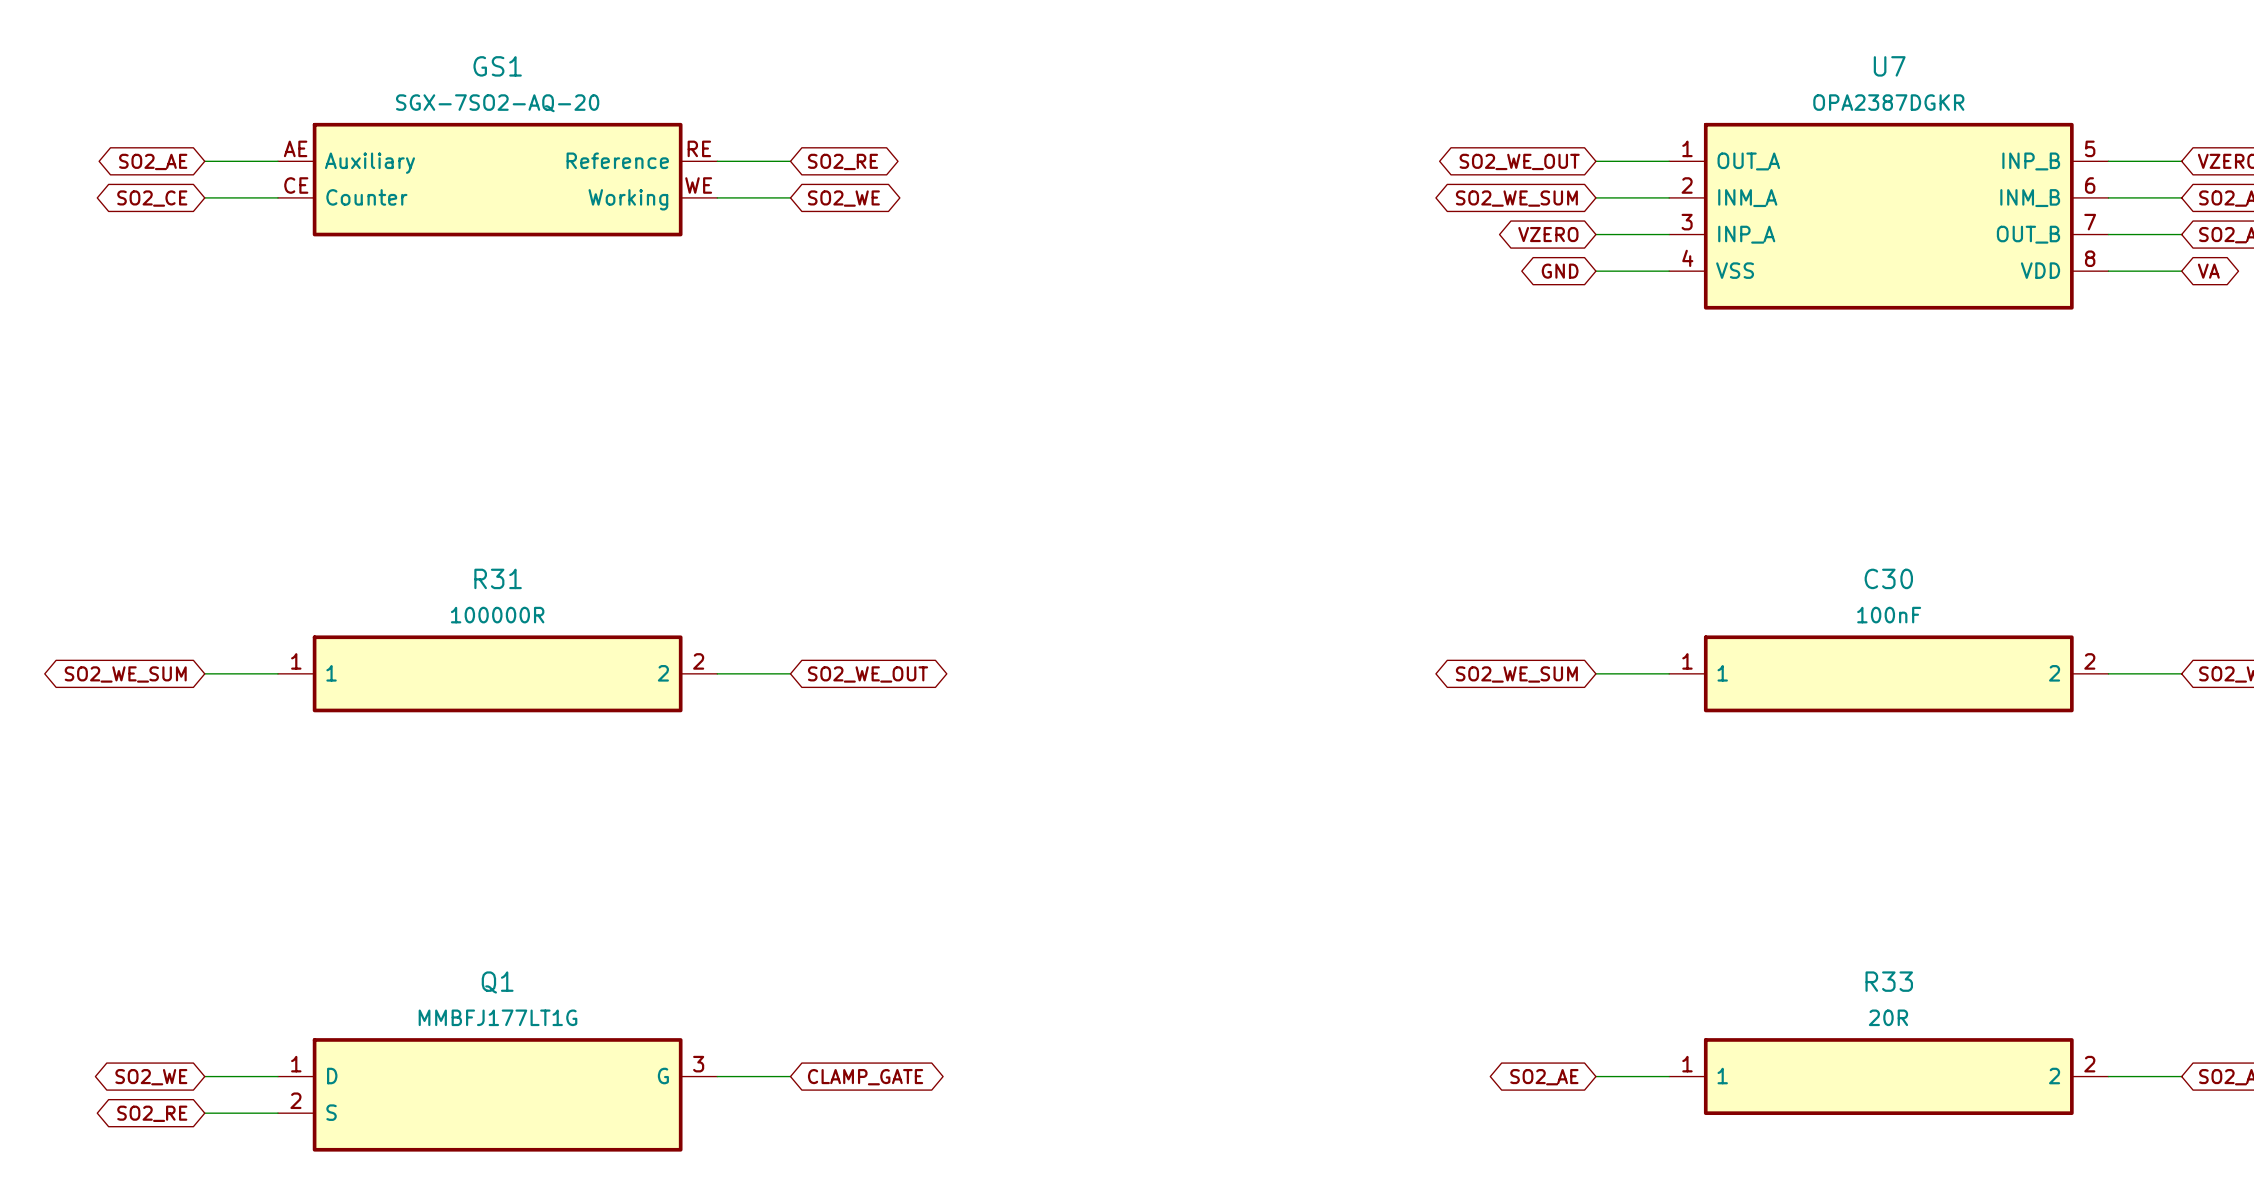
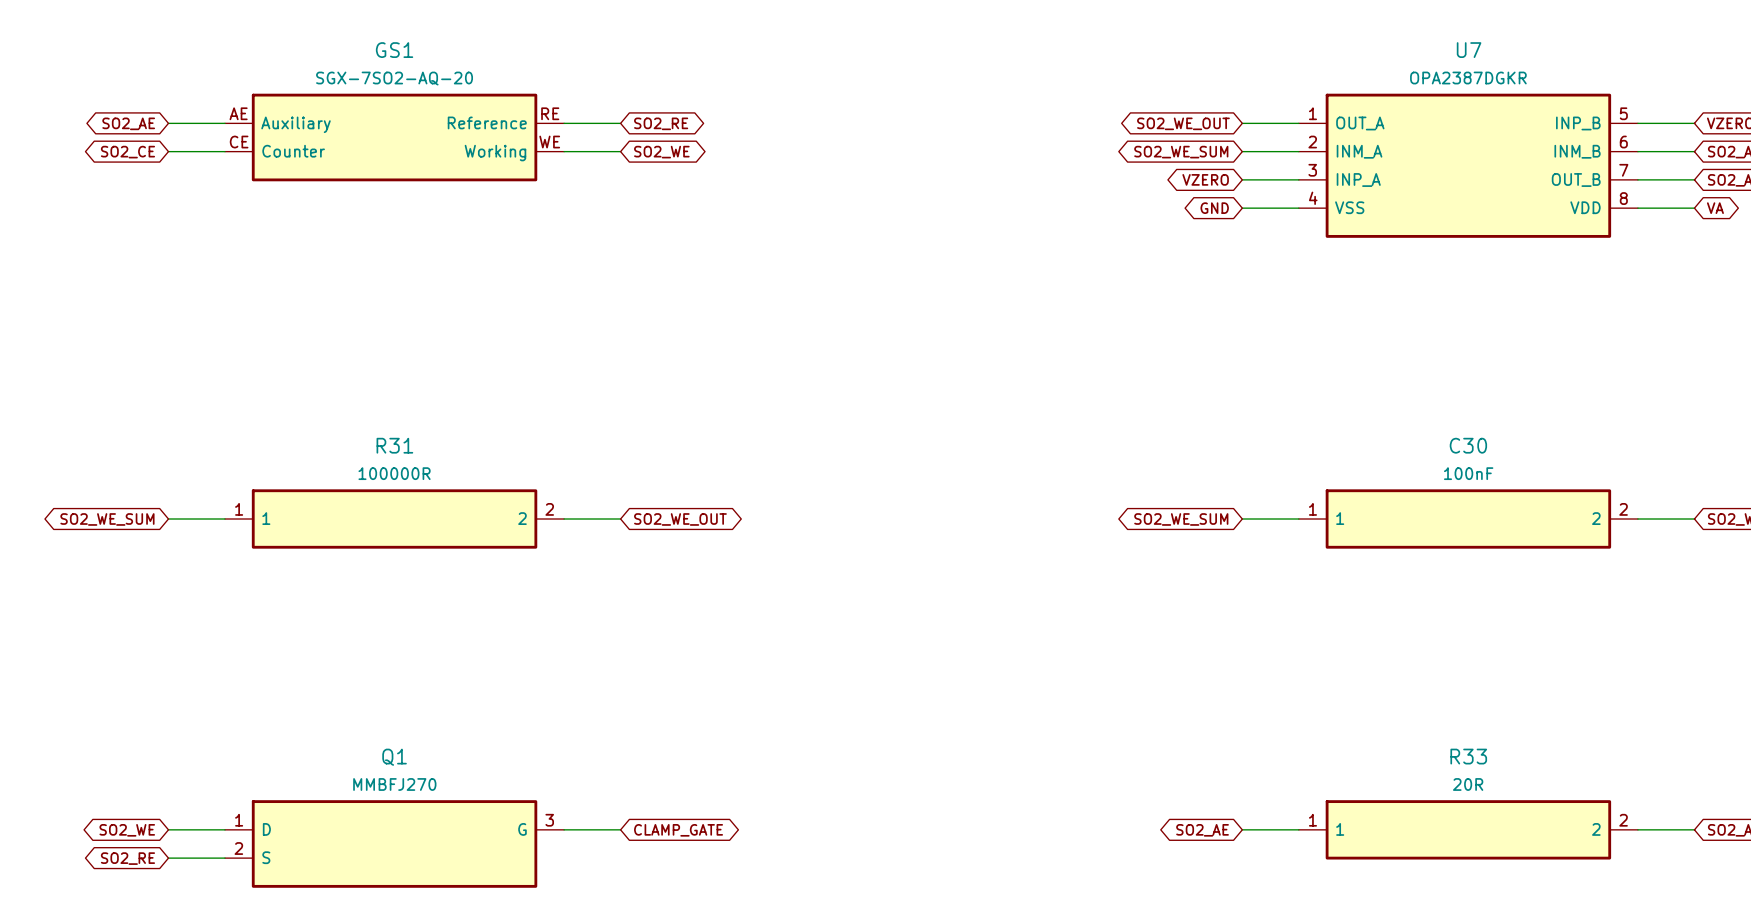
Q1 value: MMBFJ177LT1G (497, 1017) -> MMBFJ270 (394, 784)

